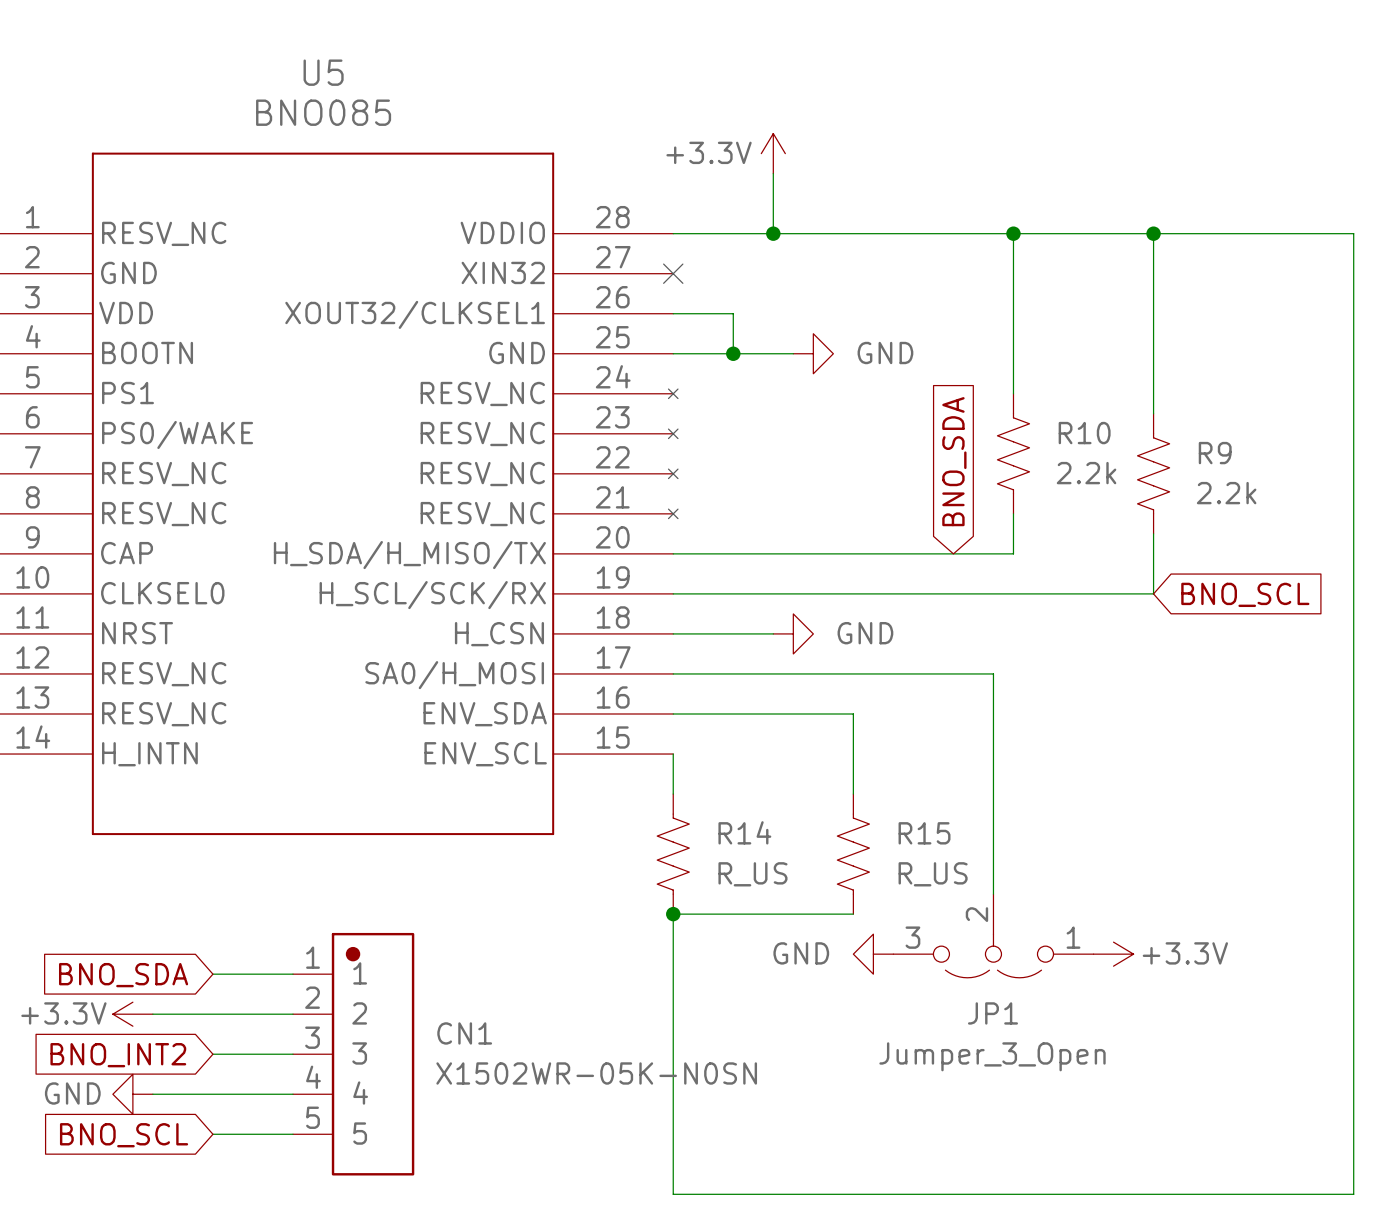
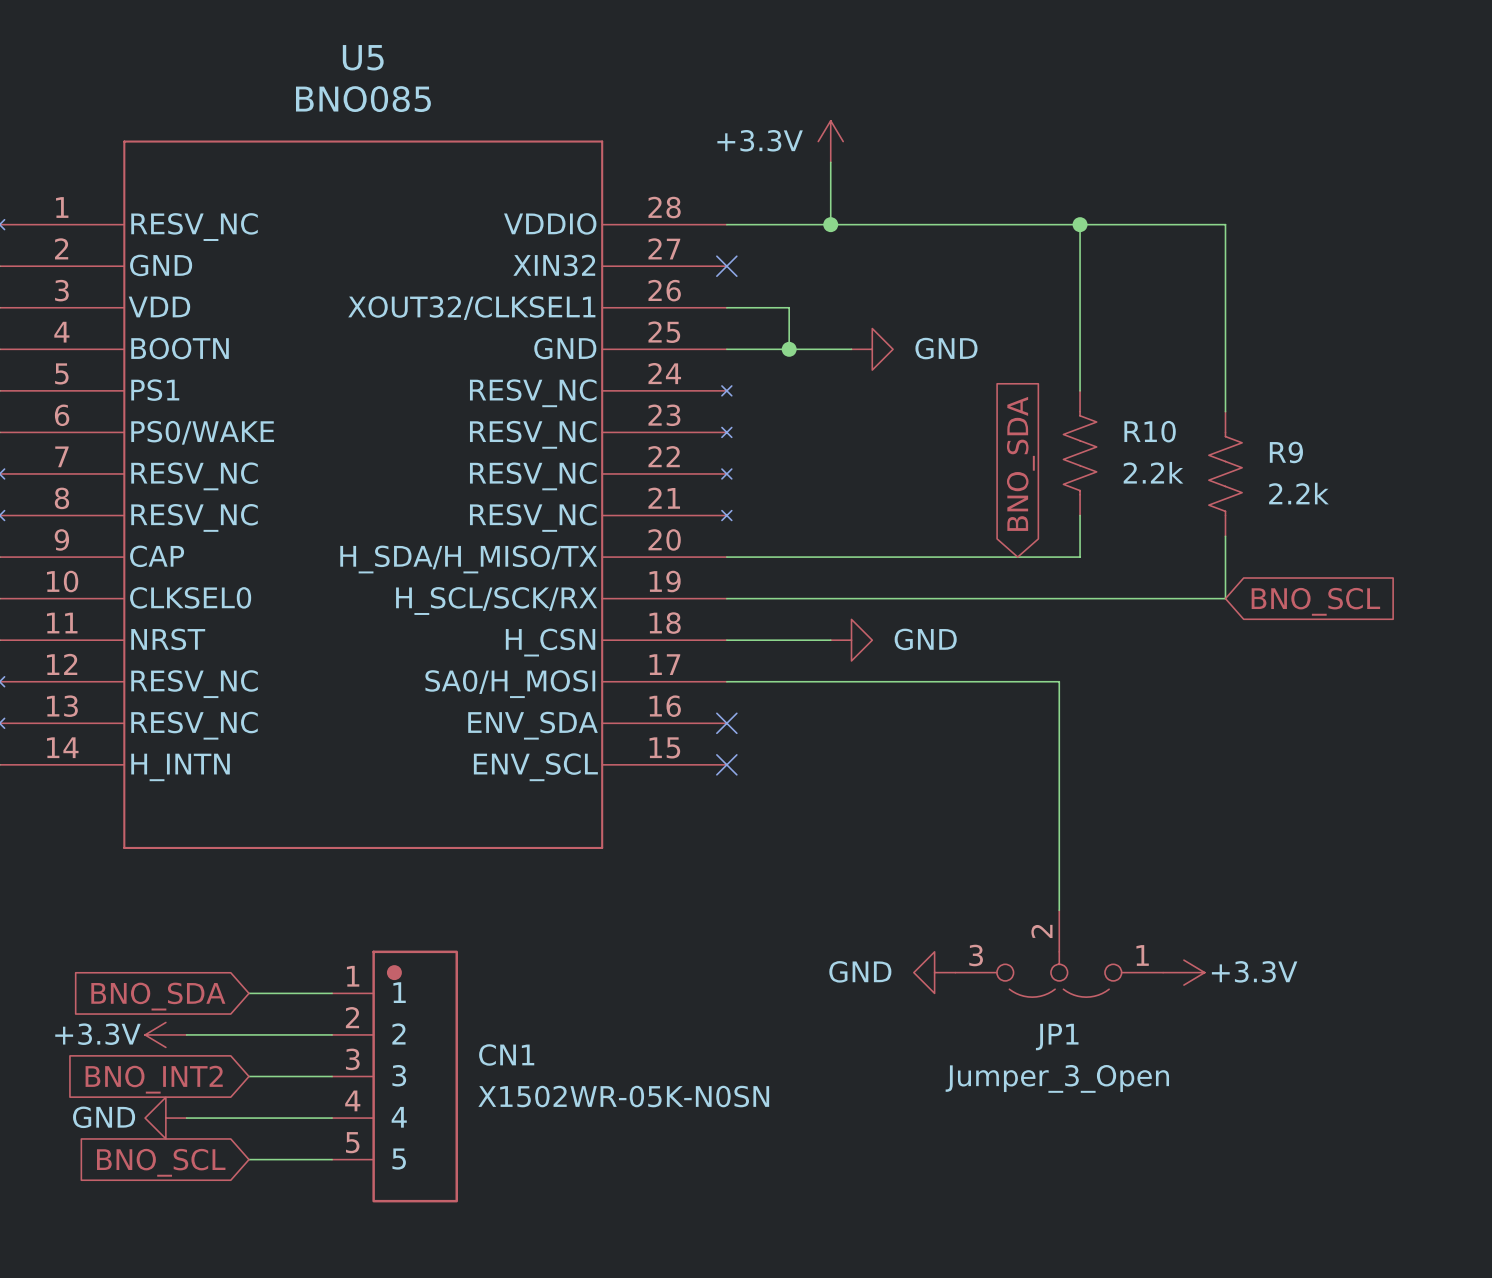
wire: (1153, 233) (1353, 233) (1353, 1194) (673, 1194) (673, 914) (853, 914) -> none
junction: (1153, 233) -> none
wire: (673, 713) (853, 713) (853, 794) -> none
no-connect mark: none -> (726, 723)
wire: (673, 754) (673, 794) -> none
no-connect mark: none -> (726, 764)
R14: R_US (673, 854) -> none
R15: R_US (853, 854) -> none
junction: (673, 914) -> none

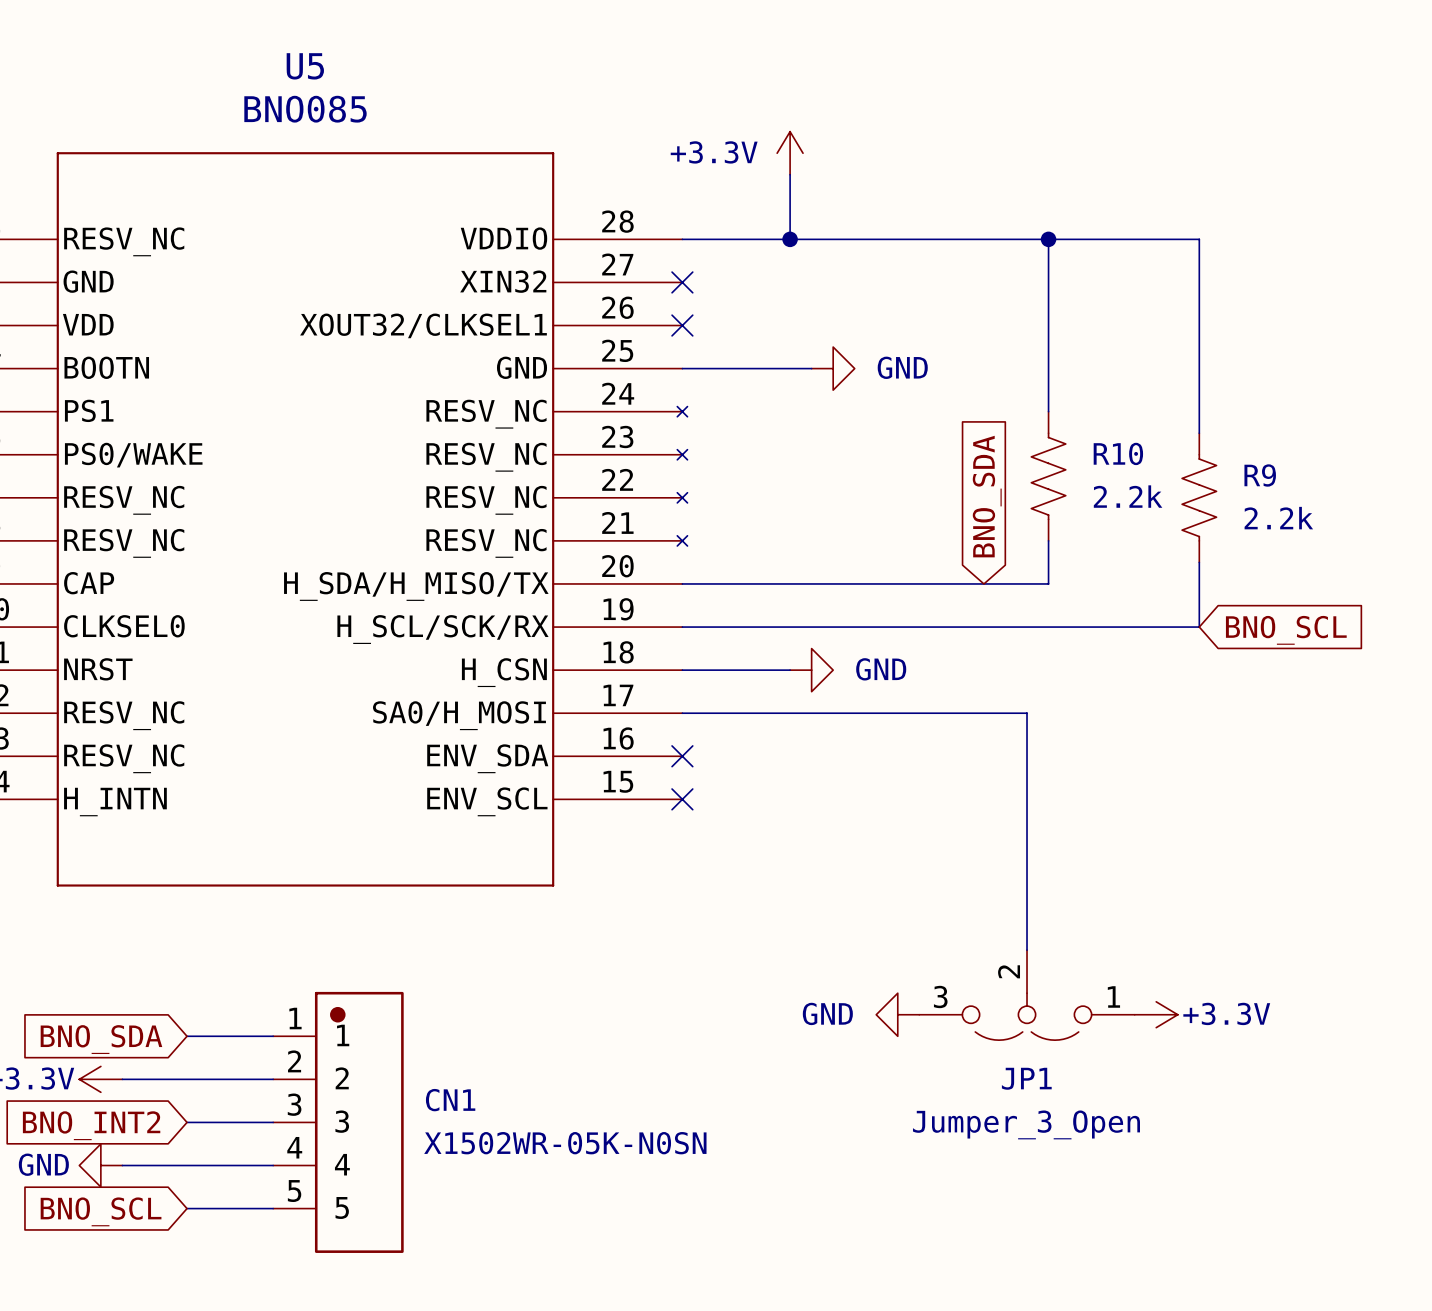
wire: (726, 307) (789, 307) (789, 349) -> none
no-connect mark: none -> (682, 325)
junction: (789, 349) -> none

